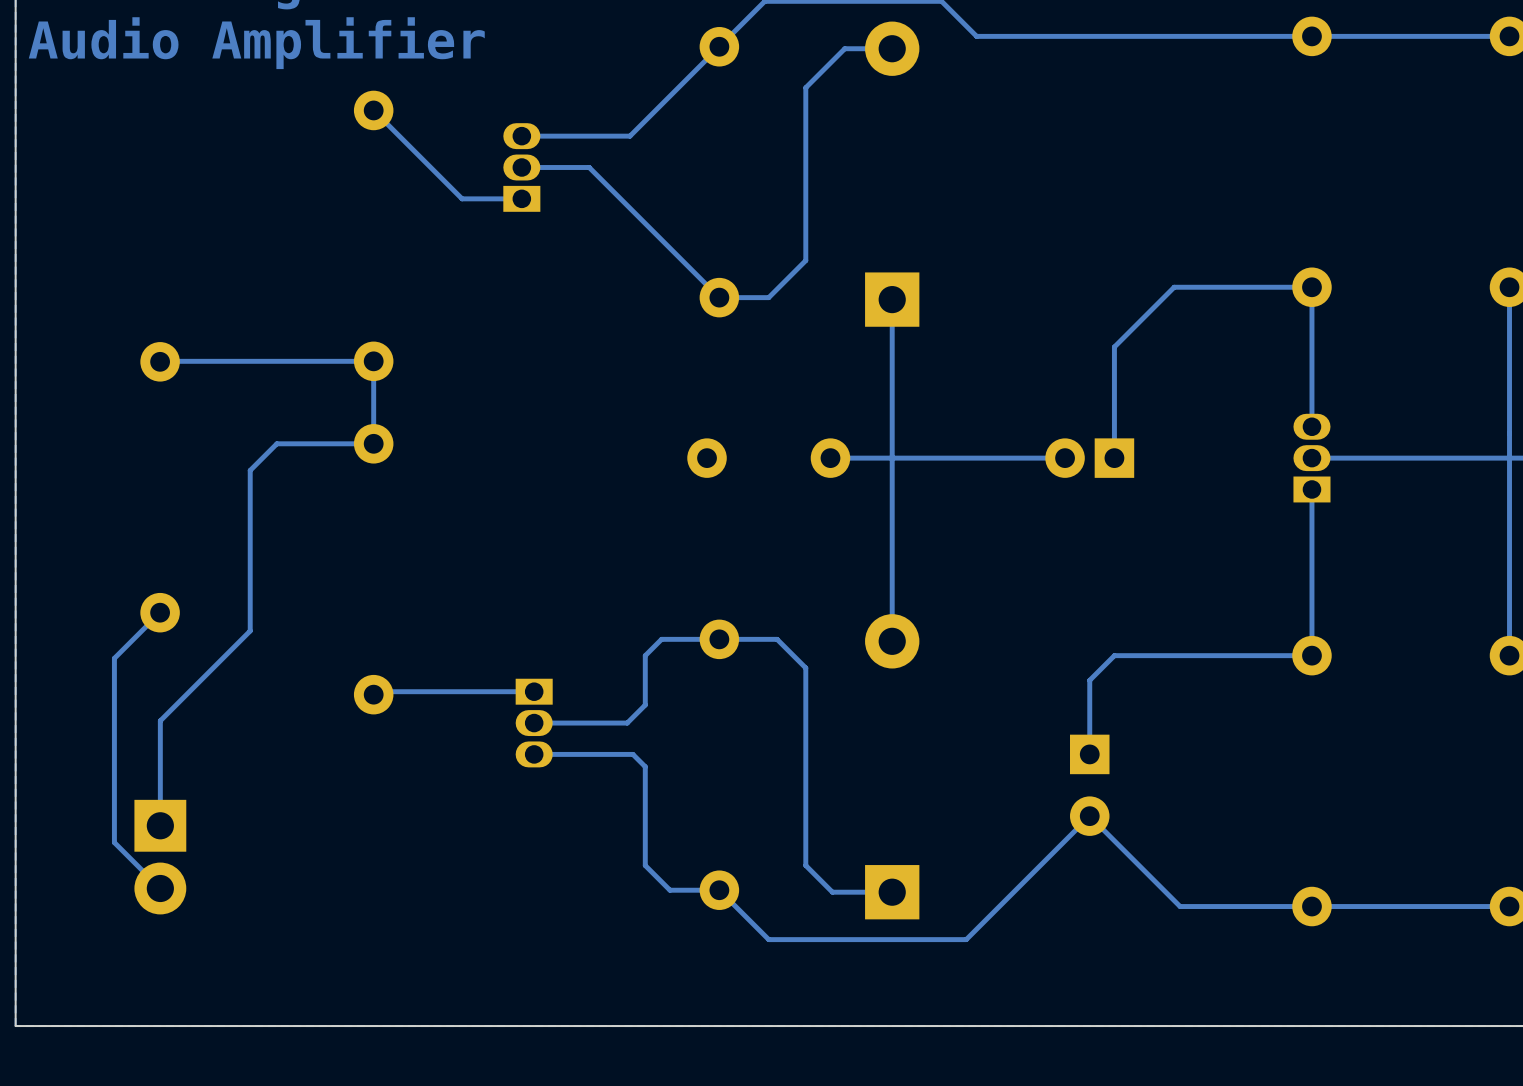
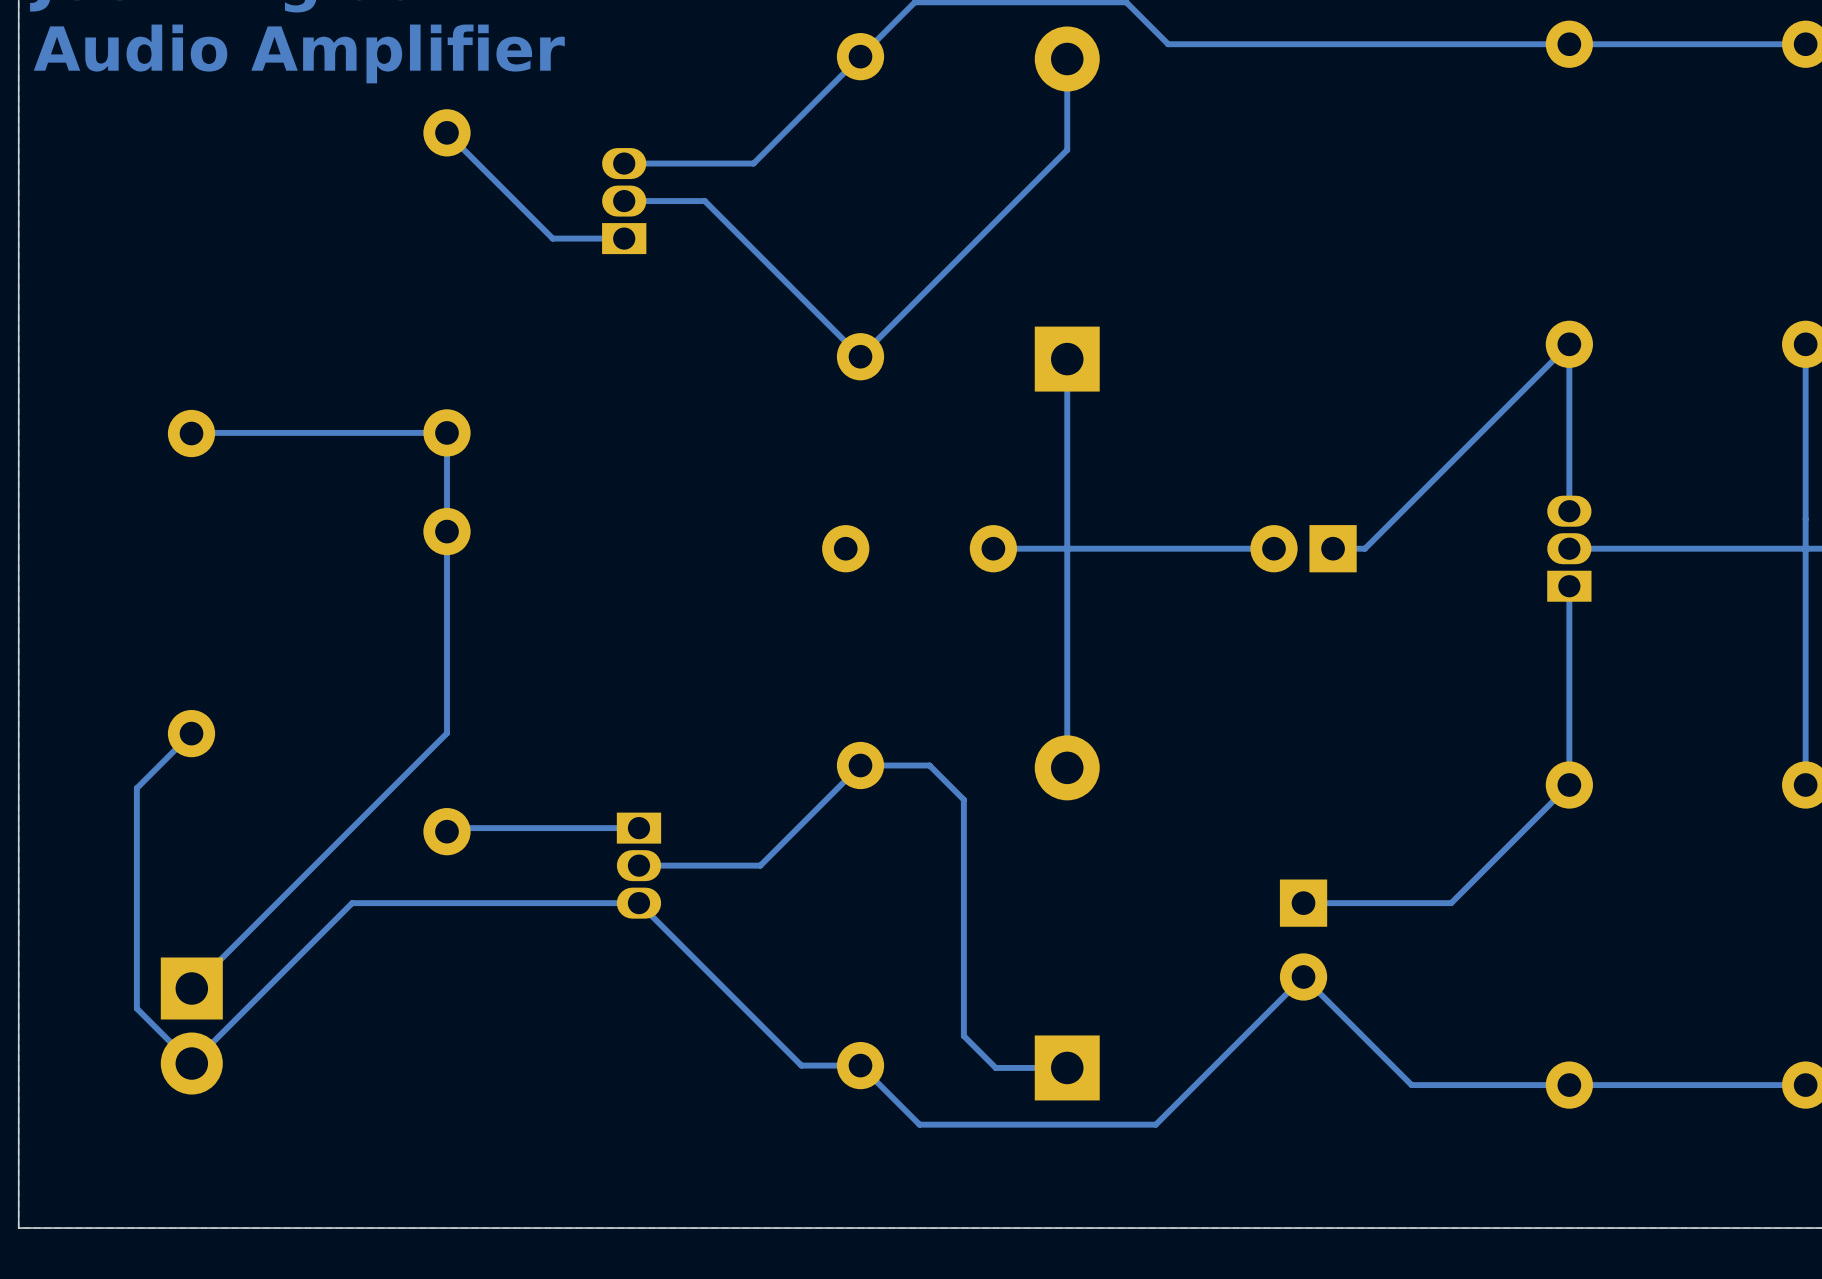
bottom track: (892, 48) (844, 48) (805, 87) (805, 260) (768, 297) (719, 297) -> (1067, 59) (1067, 149) (860, 356)
bottom track: (1311, 287) (1174, 287) (1114, 347) (1114, 458) -> (1569, 344) (1364, 548) (1333, 548)
bottom track: (373, 443) (276, 443) (250, 470) (250, 630) (160, 720) (160, 825) -> (447, 548) (447, 733) (191, 988)
bottom track: (719, 639) (661, 639) (645, 655) (645, 705) (627, 723) -> (860, 765) (760, 865) (750, 865)
bottom track: (1311, 655) (1114, 655) (1089, 680) (1089, 754) -> (1569, 784) (1451, 903) (1303, 903)
bottom track: (534, 754) (632, 754) (645, 766) (645, 865) -> (191, 1063) (352, 903) (638, 903) (771, 1036)

